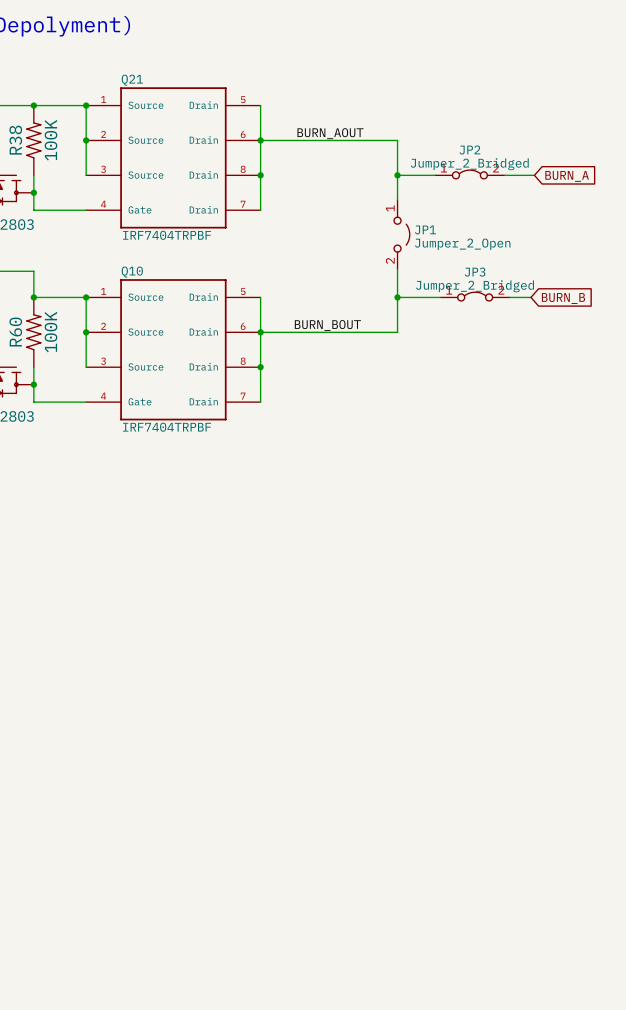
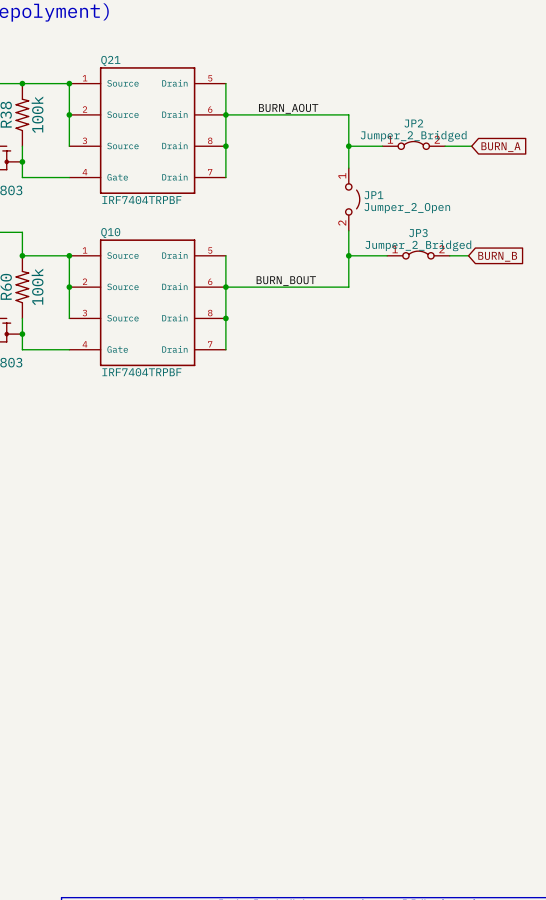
R38 value: 100K (50, 140) -> 100k (37, 114)
R60 value: 100K (50, 332) -> 100k (37, 286)

